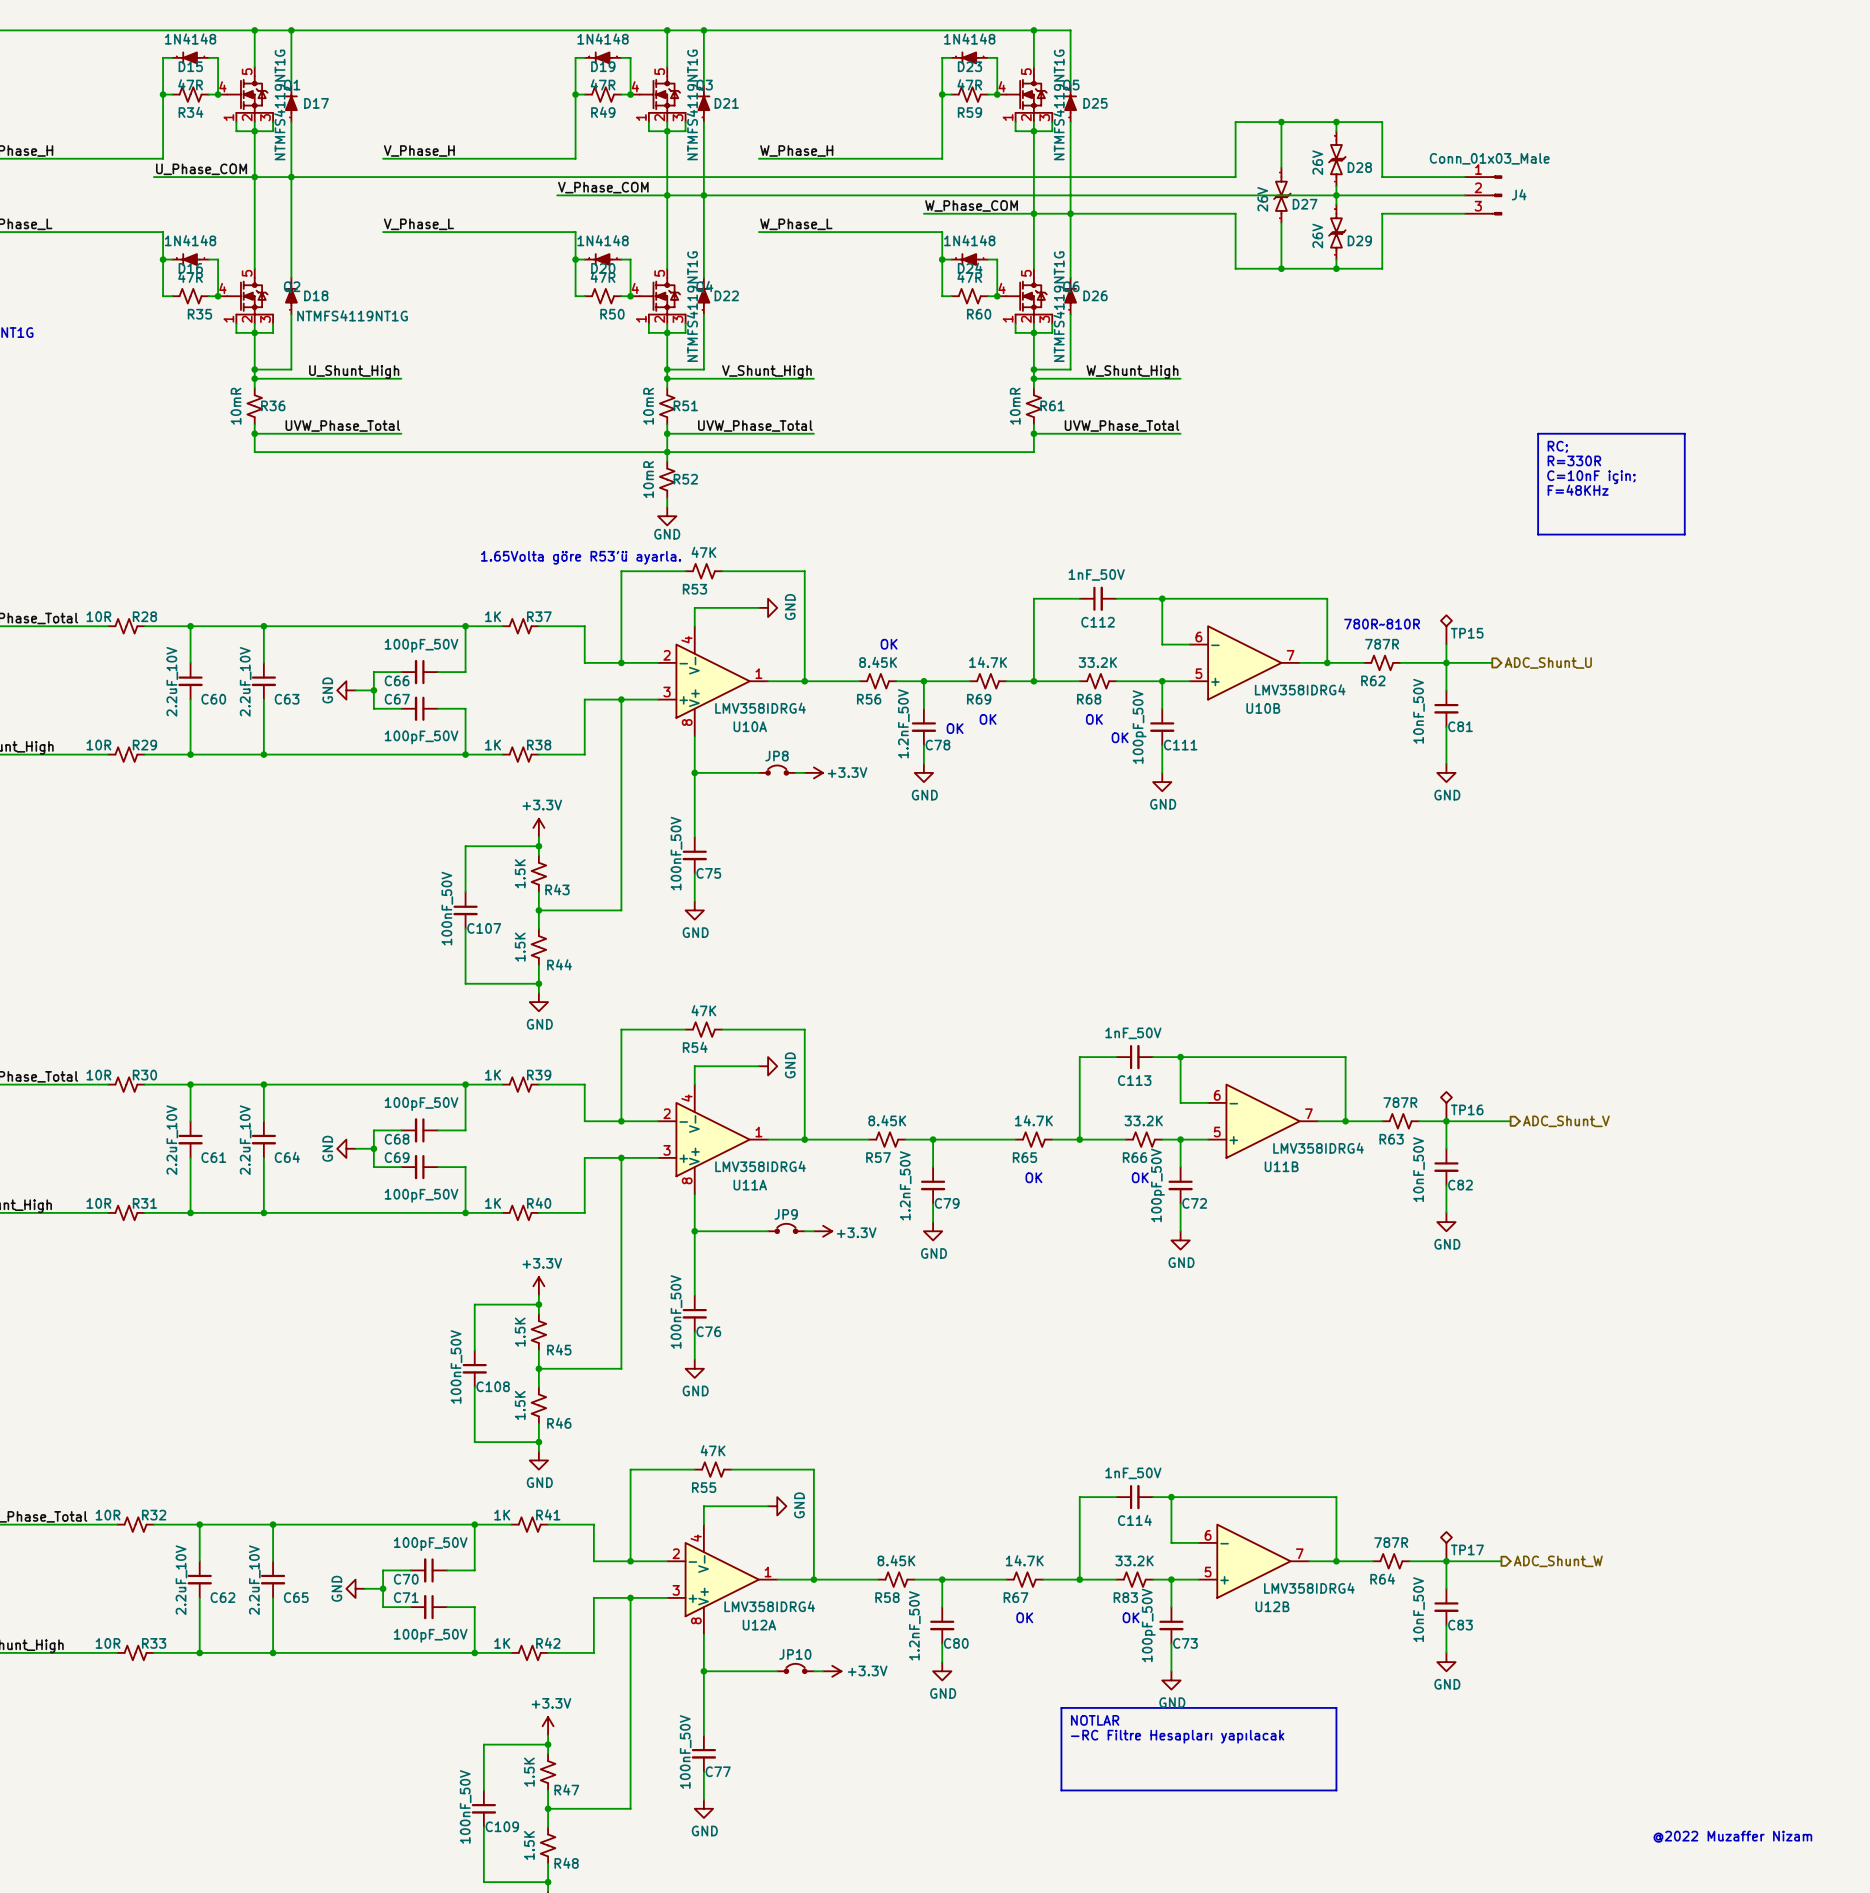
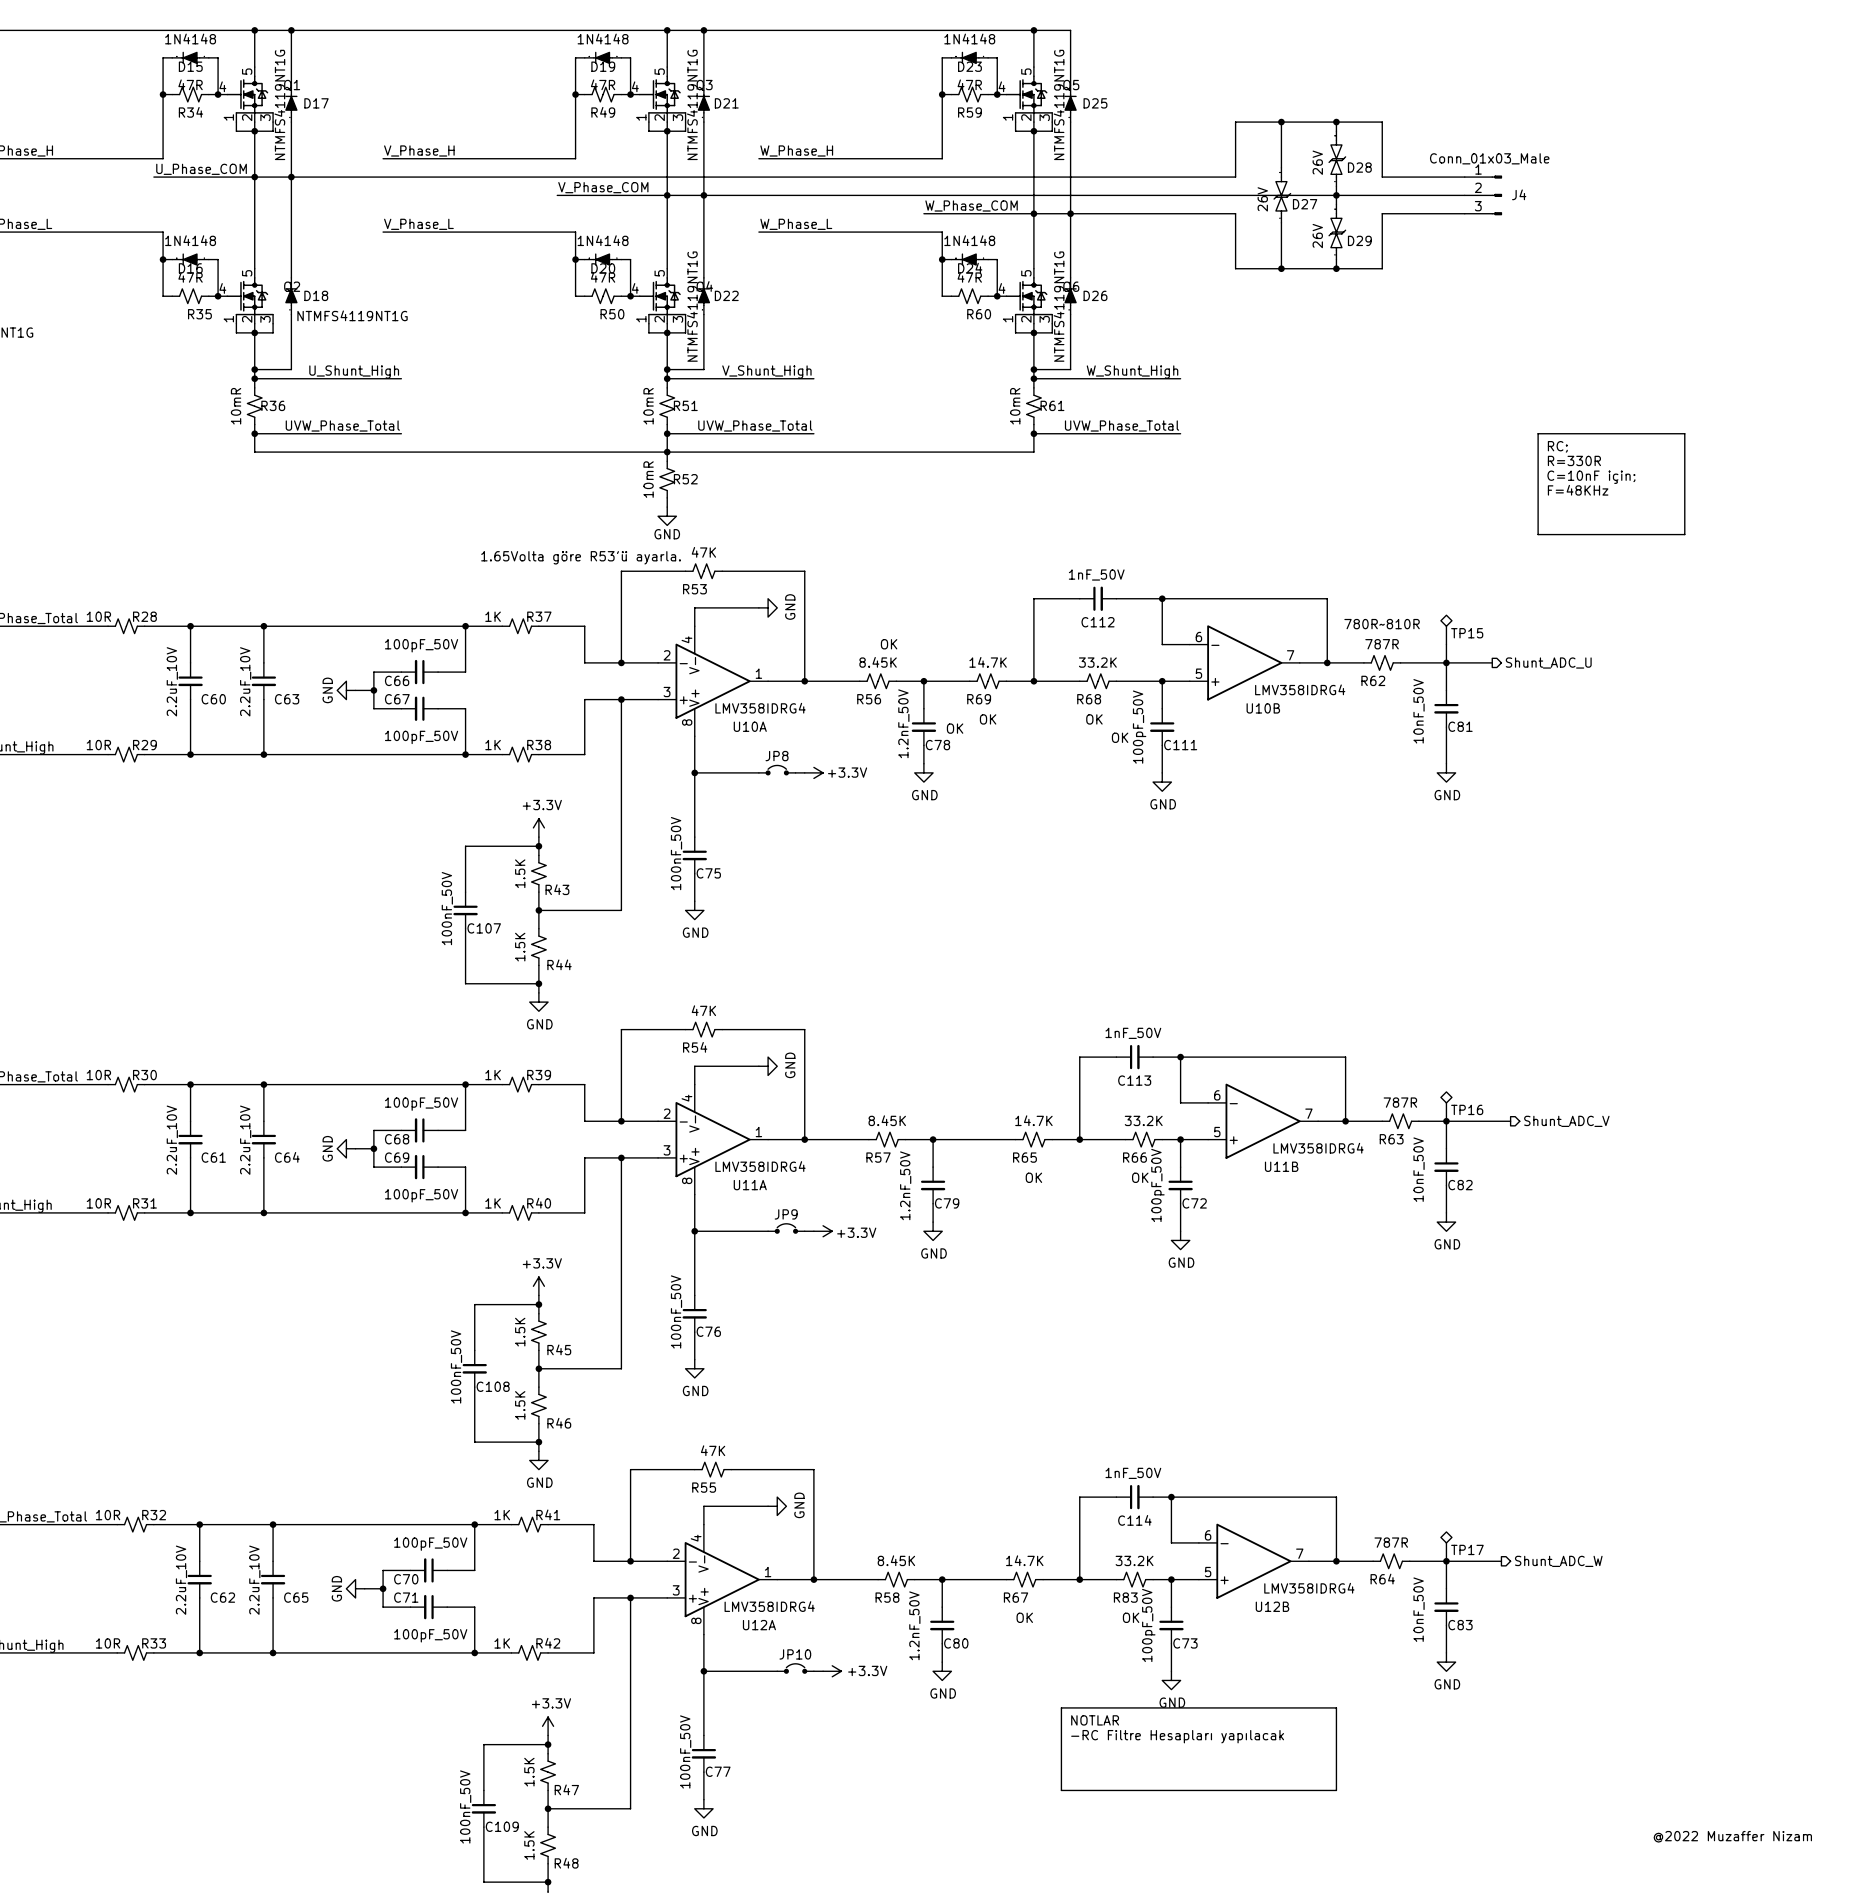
hierarchical label: ADC_Shunt_U (1548, 663) -> Shunt_ADC_U (1548, 663)
hierarchical label: ADC_Shunt_V (1566, 1121) -> Shunt_ADC_V (1566, 1121)
hierarchical label: ADC_Shunt_W (1558, 1561) -> Shunt_ADC_W (1558, 1561)

